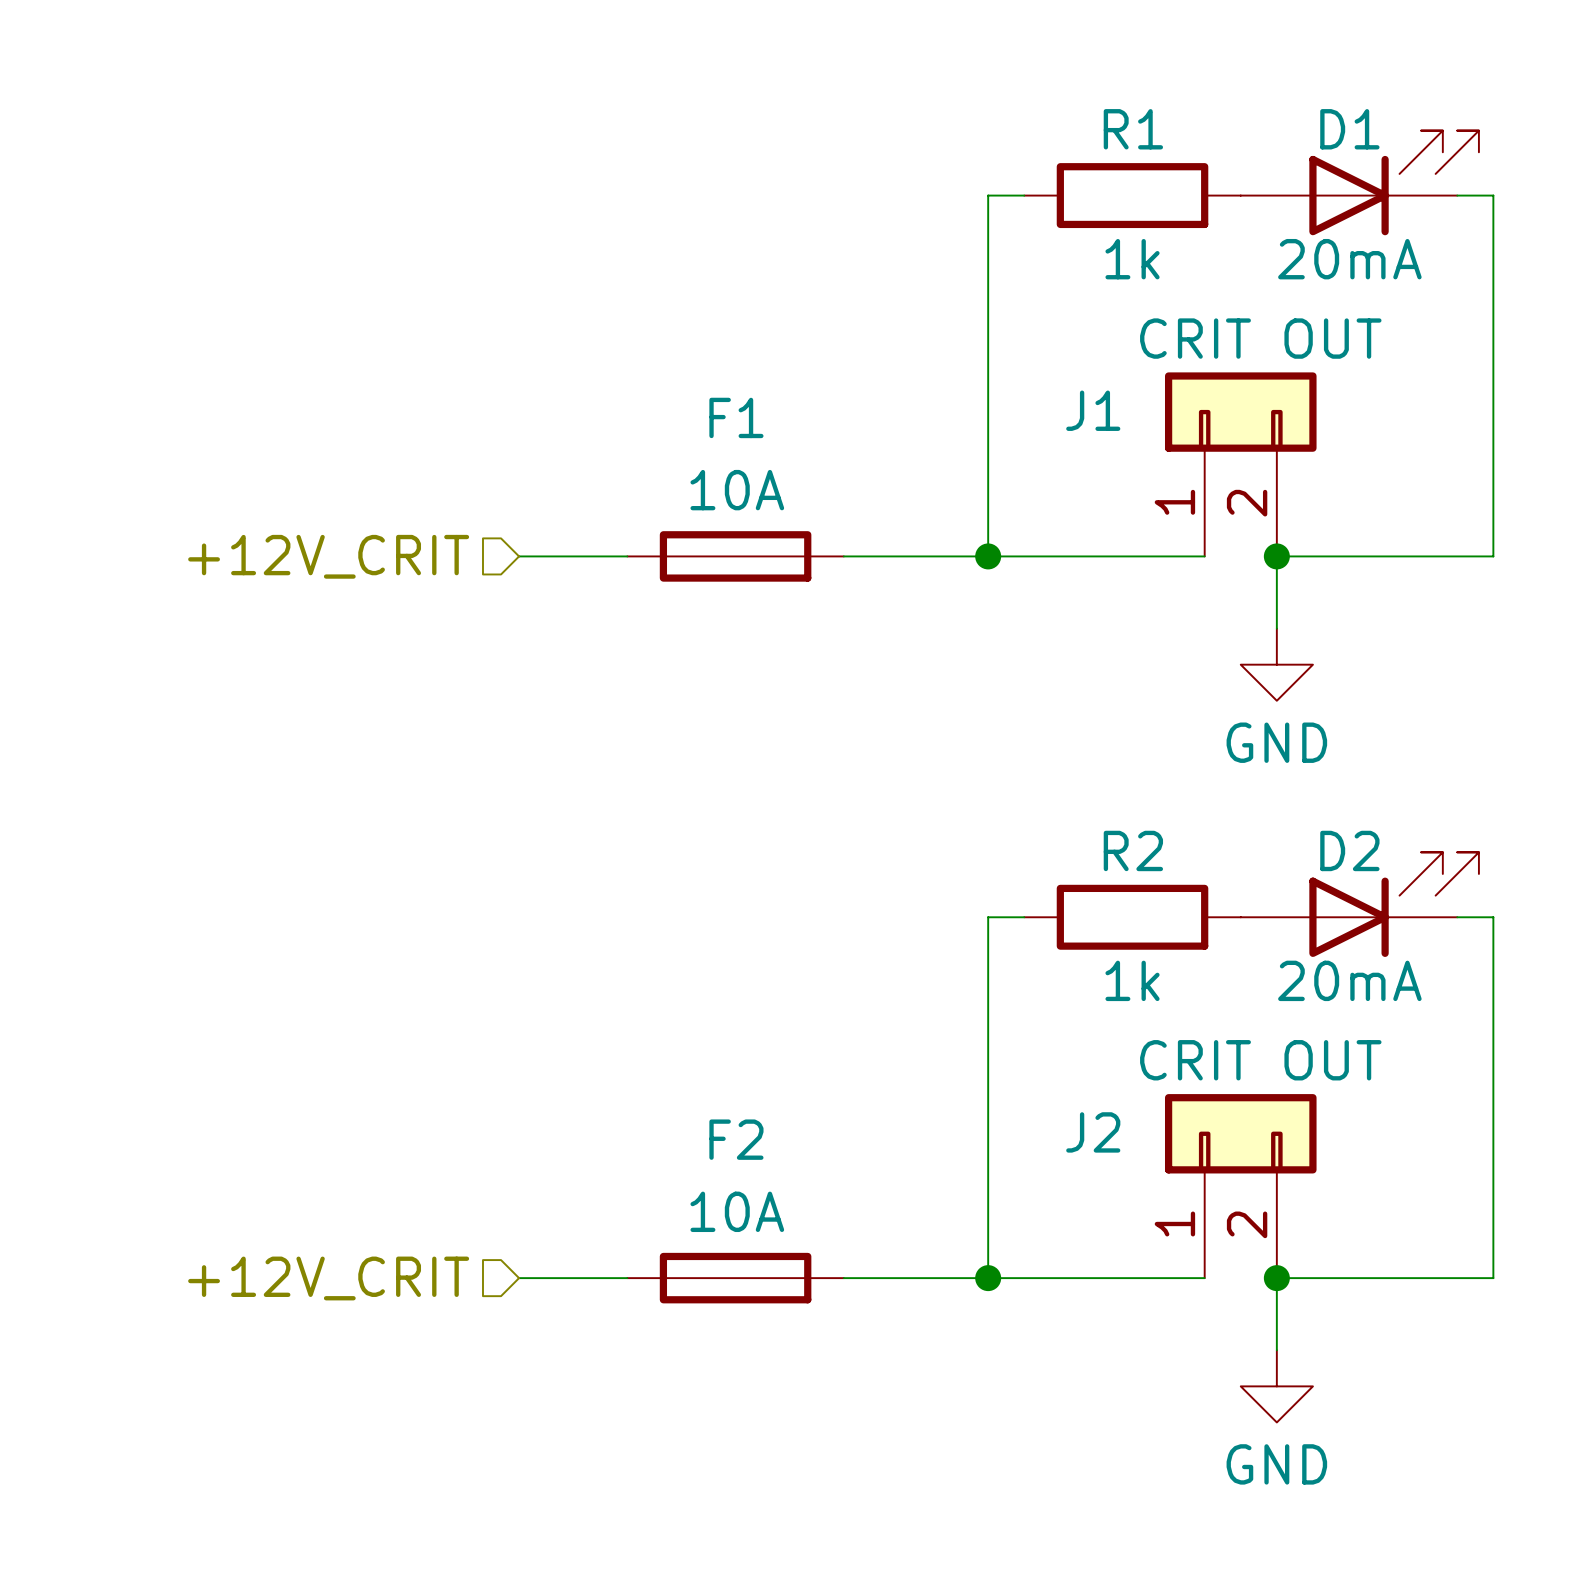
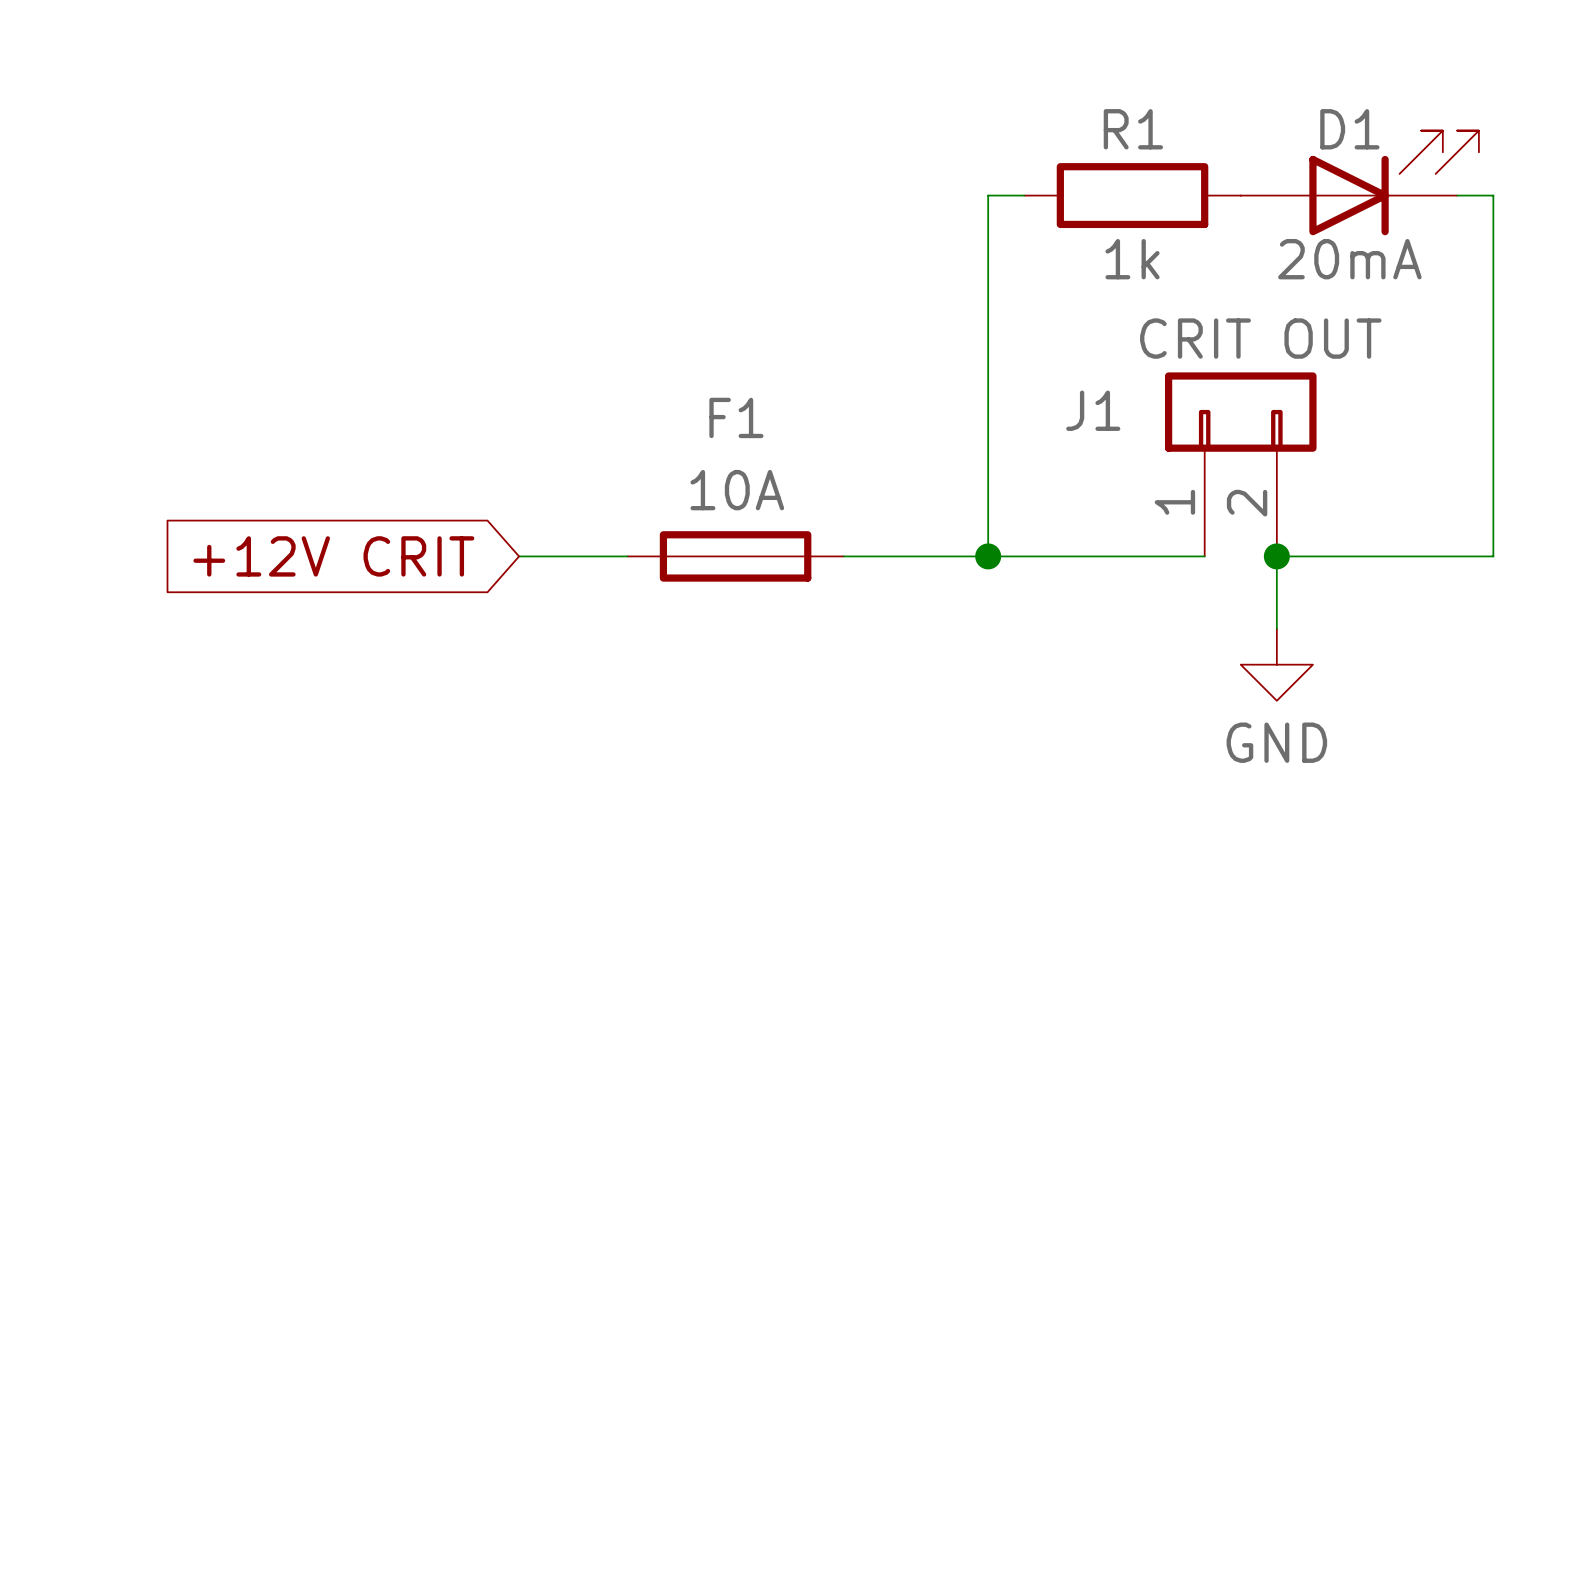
hierarchical label: +12V_CRIT (328, 556) -> none
global label: none -> +12V CRIT (333, 556)
D2: 20mA (1359, 904) -> none
wire: (1024, 917) (988, 917) (988, 1278) -> none
R2: 1k (1132, 917) -> none
wire: (1457, 917) (1493, 917) (1493, 1278) (1276, 1278) (1276, 1350) -> none
J2: CRIT OUT (1240, 1186) -> none
hierarchical label: +12V_CRIT (328, 1278) -> none
wire: (519, 1278) (627, 1278) -> none
F2: 10A (735, 1278) -> none
wire: (843, 1278) (1204, 1278) -> none
junction: (988, 1278) -> none
junction: (1276, 1278) -> none
power symbol: GND (1276, 1386) -> none

